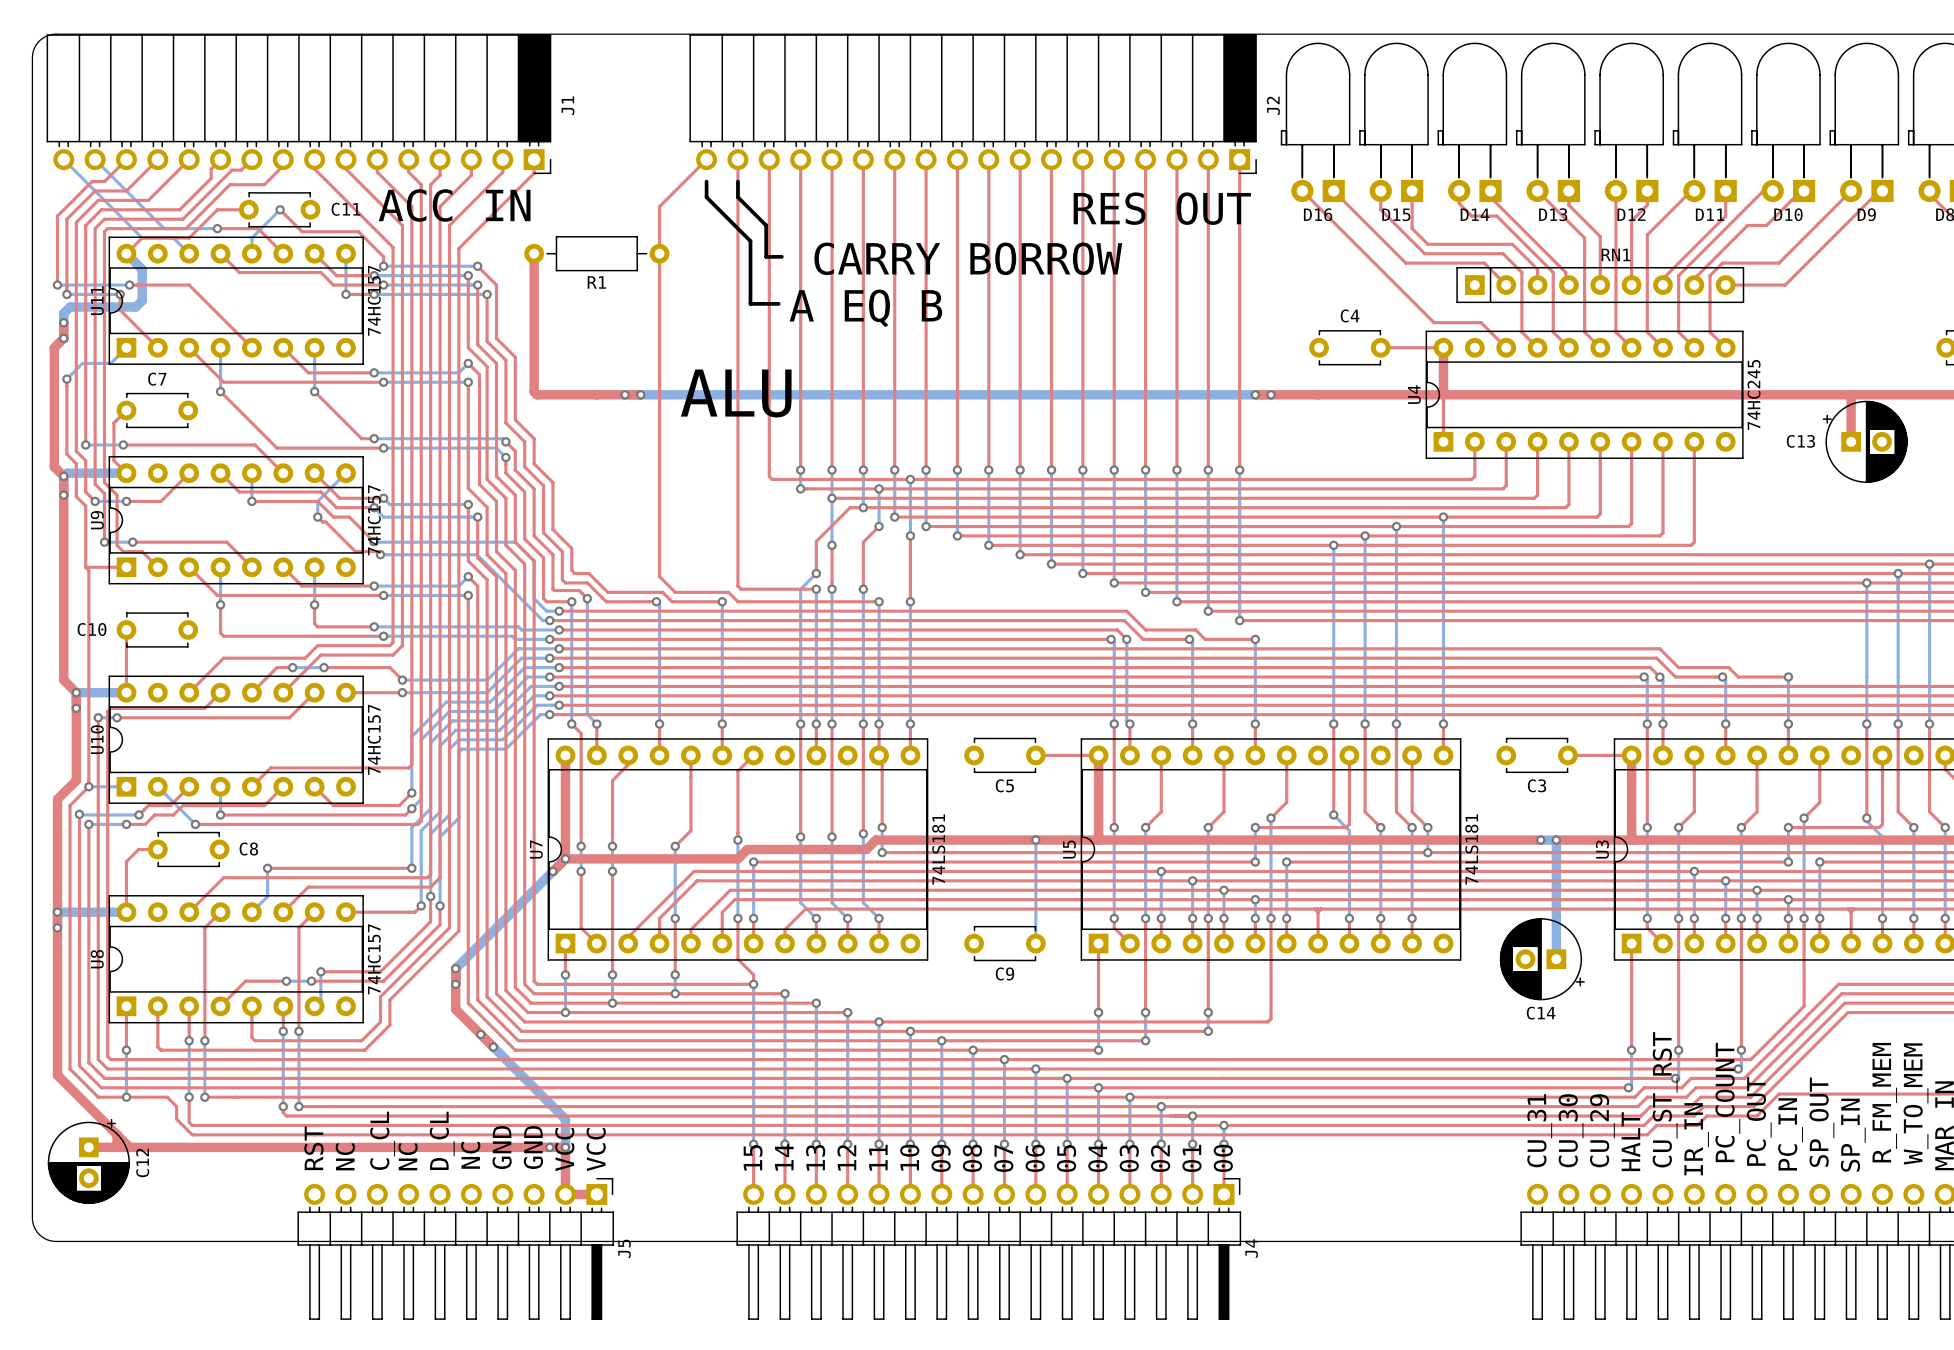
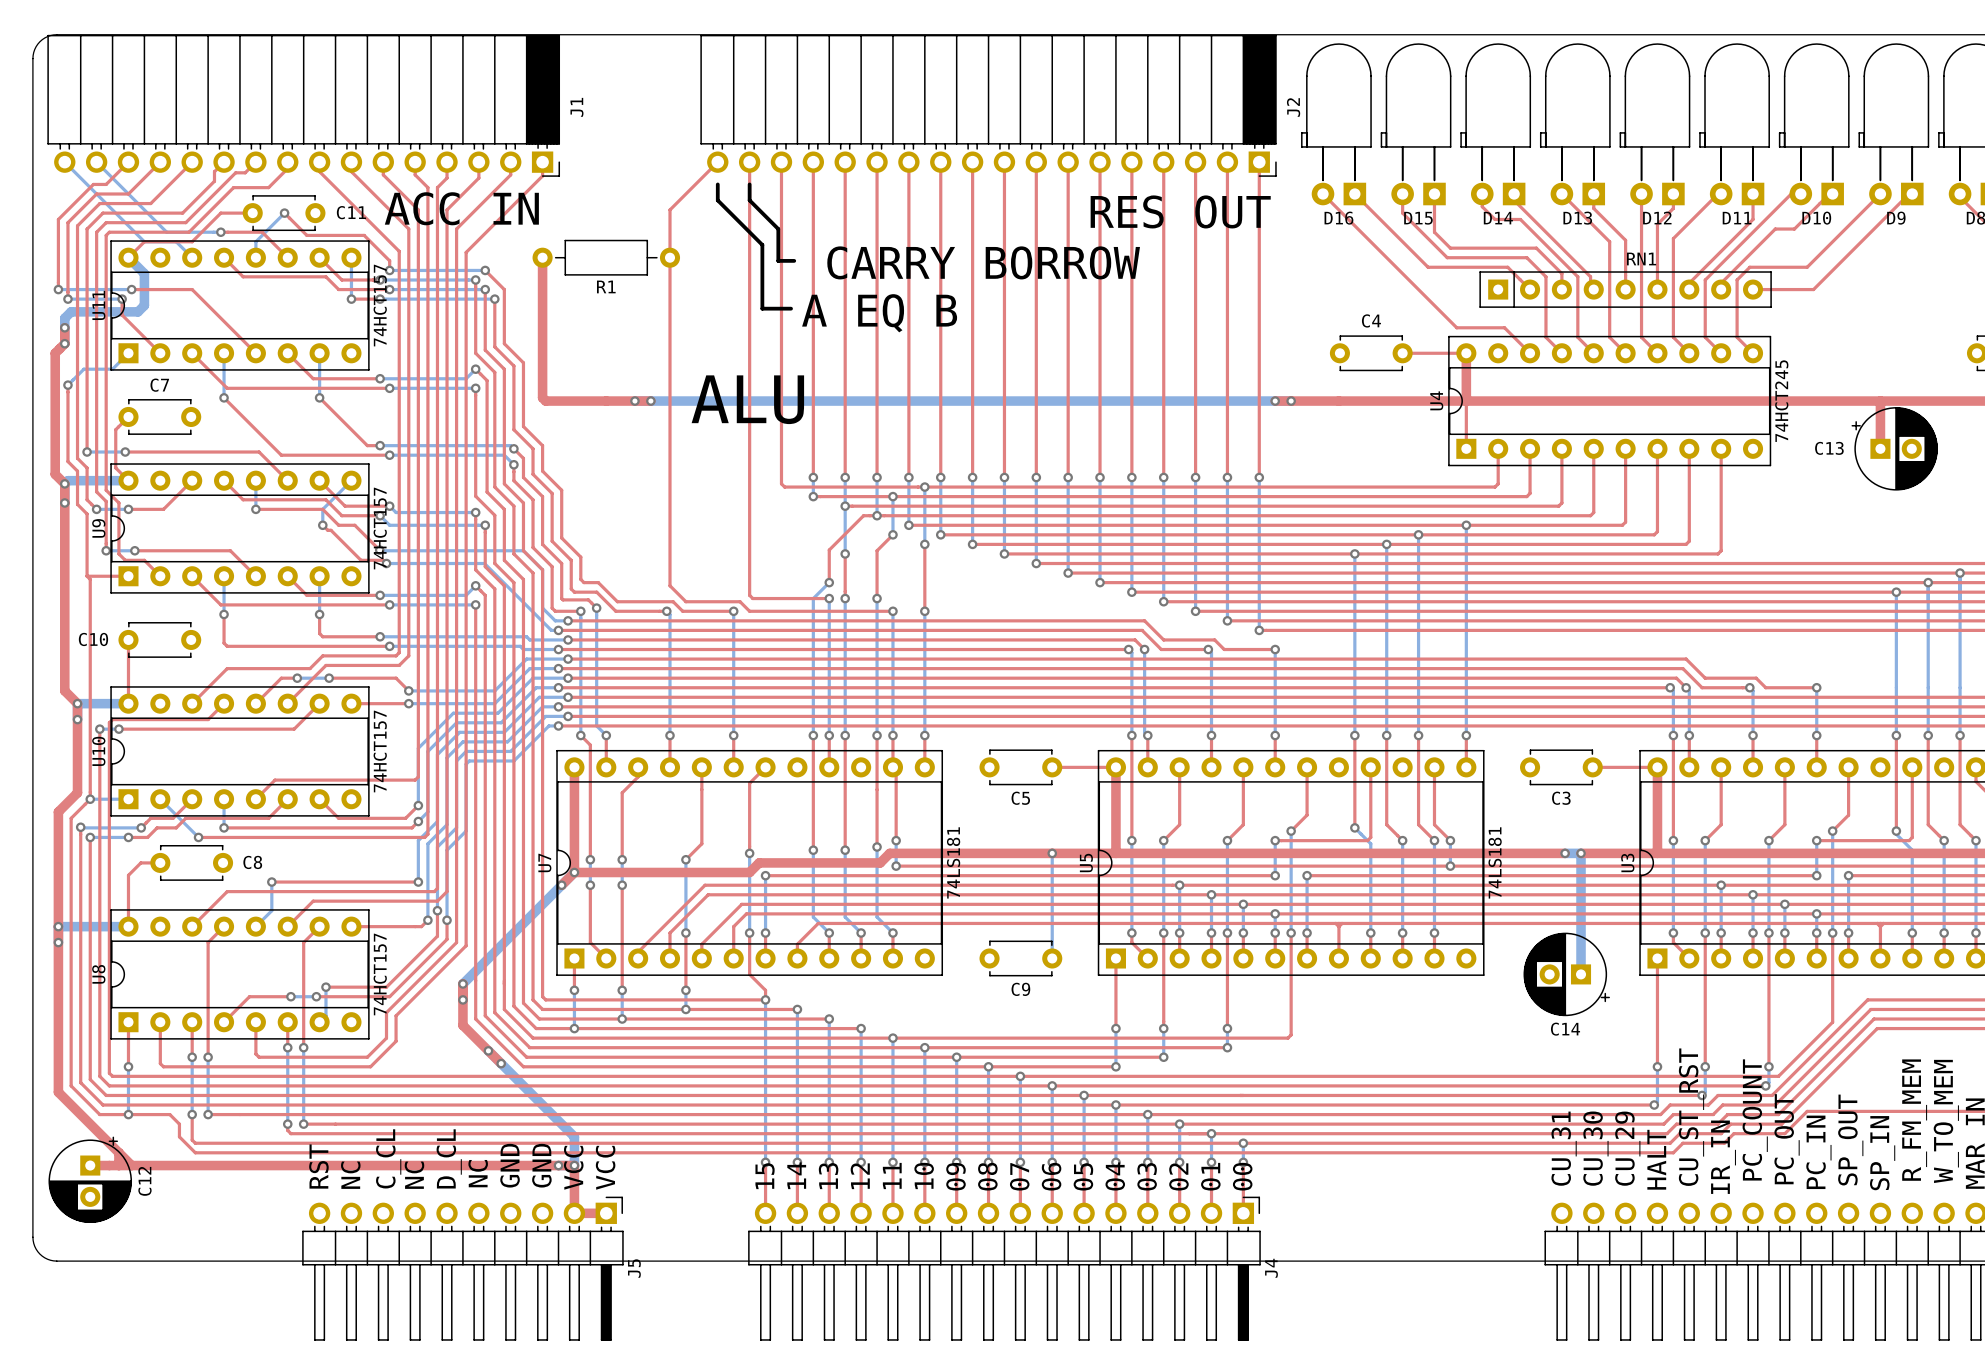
U11 value: 74HC157 (374, 300) -> 74HCT157 (380, 305)
U4 value: 74HC245 (1754, 394) -> 74HCT245 (1781, 401)
U9 value: 74HC157 (374, 520) -> 74HCT157 (380, 528)
U10 value: 74HC157 (374, 739) -> 74HCT157 (380, 751)
U8 value: 74HC157 (374, 959) -> 74HCT157 (380, 974)

